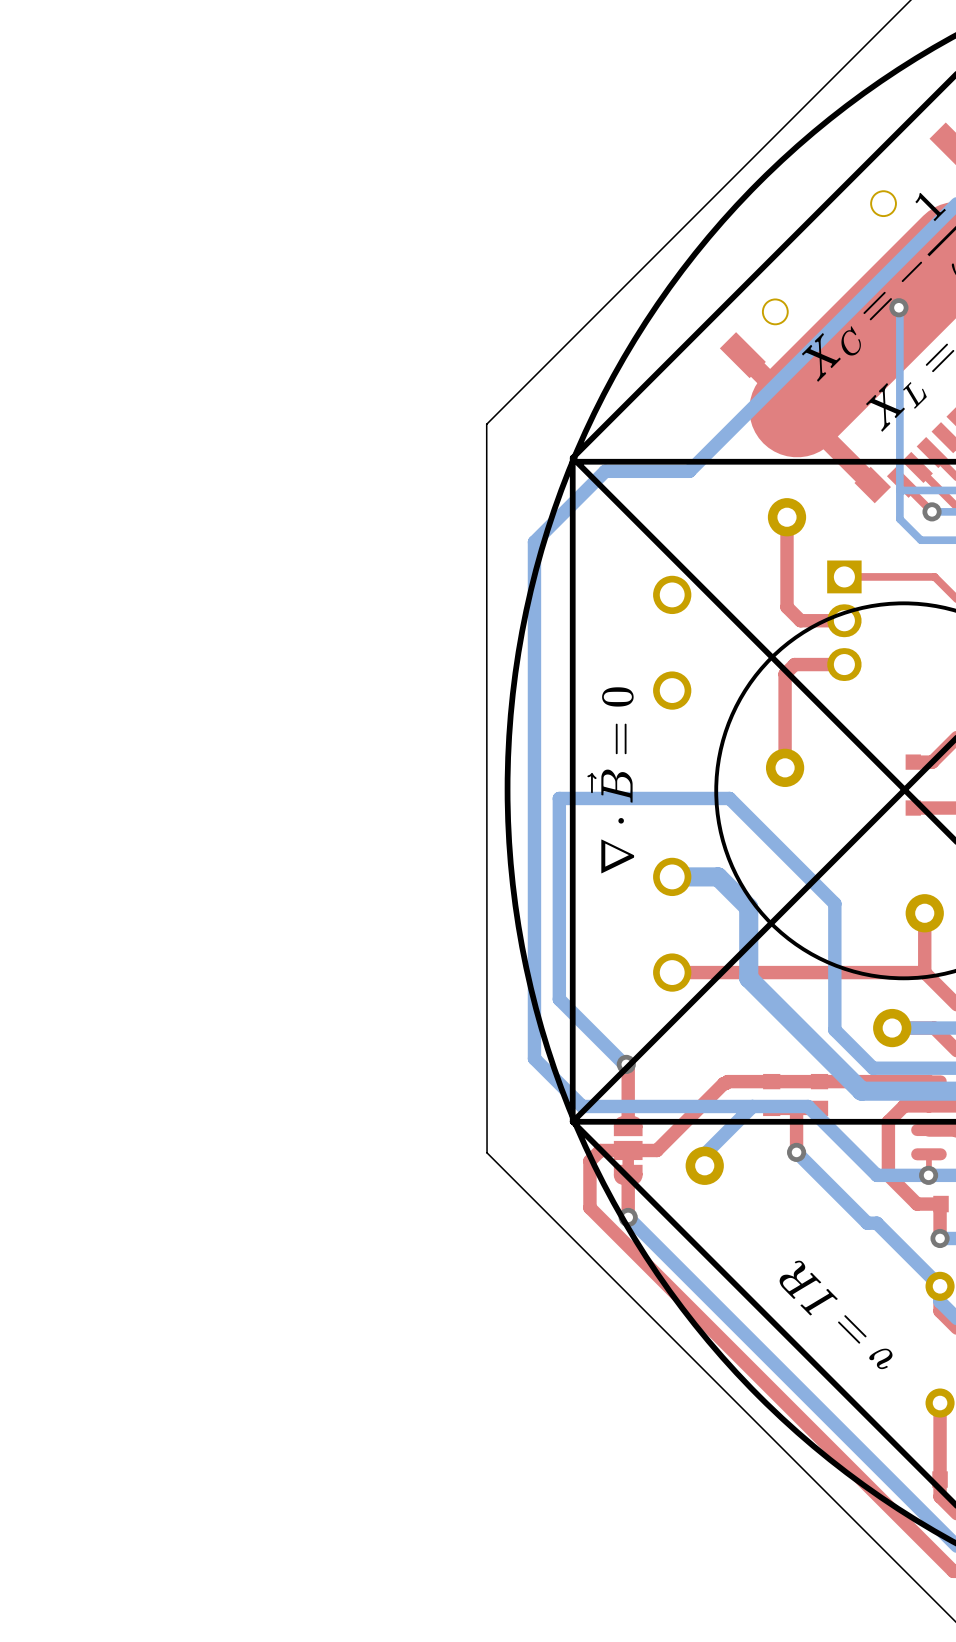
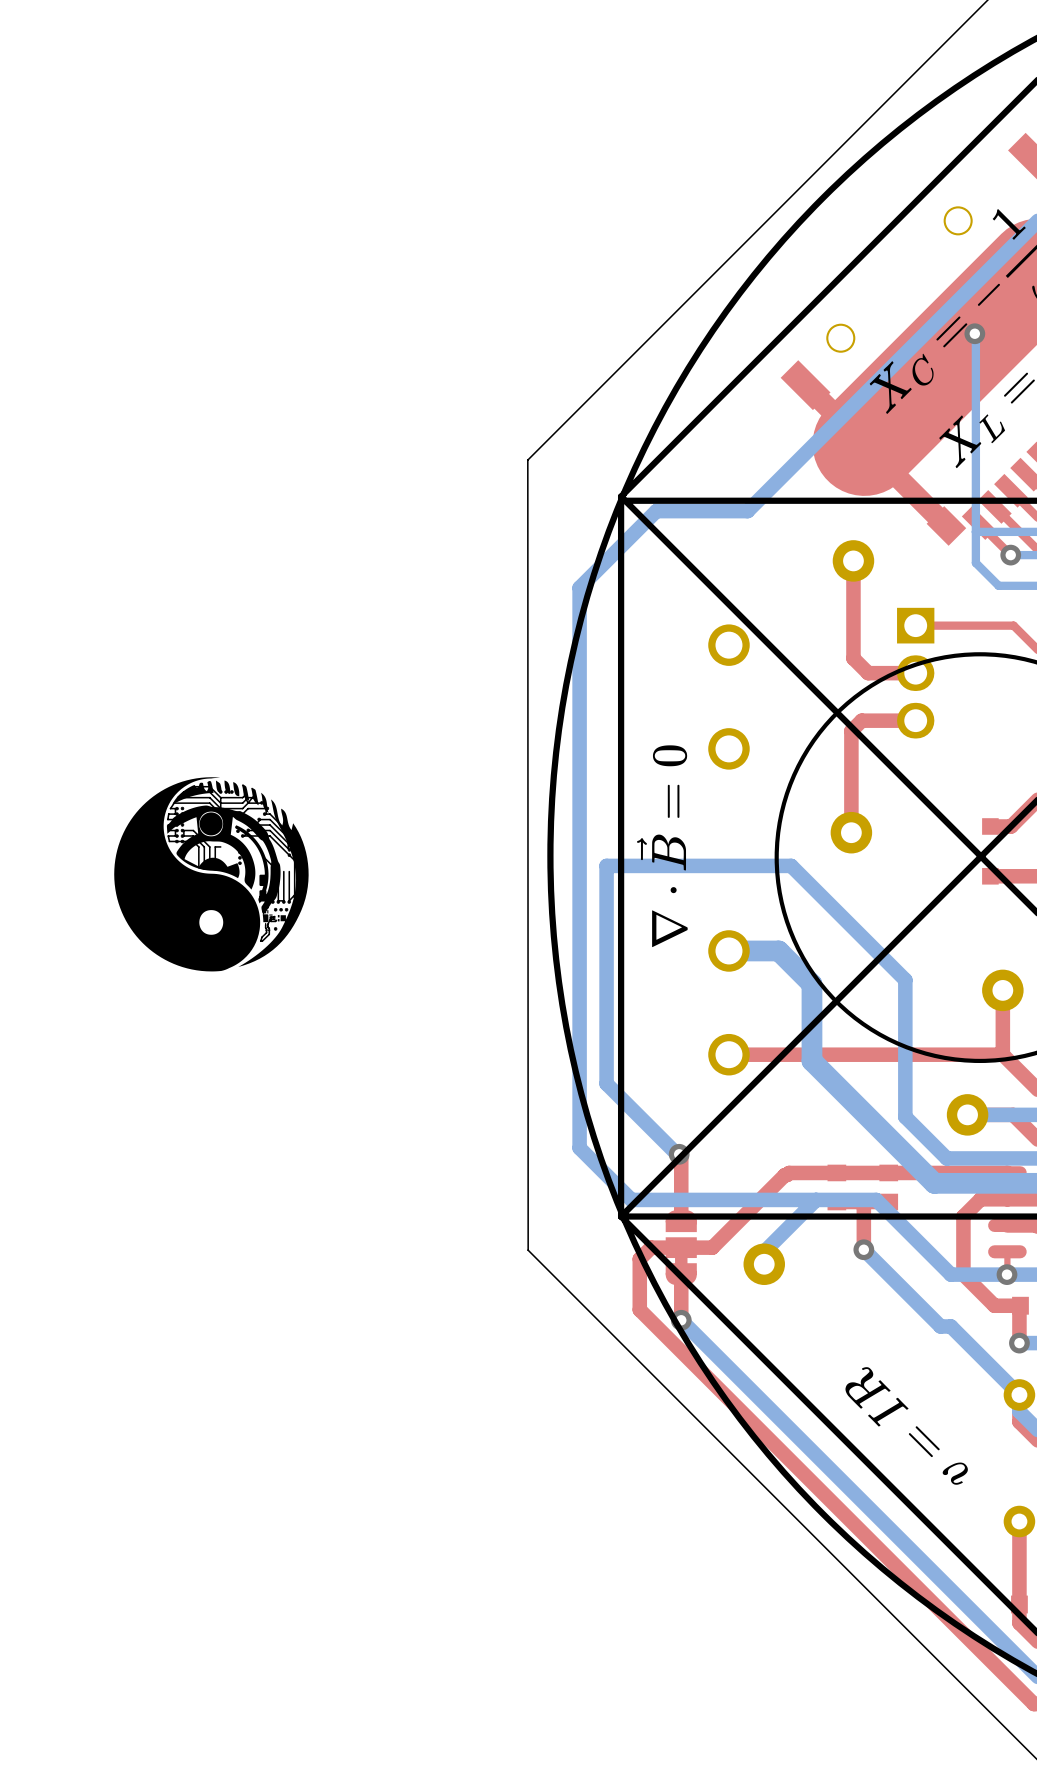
drawing: none -> [114, 777, 309, 972]
line: none -> (192, 786) (209, 786) (220, 797)
line: none -> (220, 797) (242, 797) (244, 795) (248, 803)
line: none -> (220, 797) (220, 808)
line: none -> (248, 803) (252, 797) (248, 797) (242, 803) (220, 803) (209, 792) (183, 792) (177, 797) (209, 797) (220, 808)
line: none -> (248, 803) (242, 808) (220, 808)
line: none -> (260, 803) (248, 803)
line: none -> (220, 846) (215, 846) (215, 869) (209, 868) (209, 846) (193, 830) (183, 830) (183, 835) (193, 835) (204, 846) (204, 868) (198, 867) (198, 846) (193, 841) (169, 841) (168, 835) (175, 835) (175, 830) (168, 830) (168, 825) (175, 825) (175, 819) (167, 819) (168, 814) (175, 814) (175, 808) (170, 808) (174, 803) (209, 803) (220, 814) (242, 814) (248, 808) (266, 808) (266, 814) (270, 814) (288, 832) (288, 837) (270, 819) (260, 819) (255, 825) (270, 825) (288, 843) (288, 848) (270, 830) (249, 830) (244, 835) (270, 835) (294, 860) (294, 894) (289, 900) (289, 871)
line: none -> (264, 857) (278, 871) (278, 900) (283, 900) (283, 871)
line: none -> (270, 917) (273, 917) (273, 919) (270, 919) (270, 921) (276, 920)
line: none -> (270, 917) (267, 924) (269, 934) (260, 941) (266, 932) (265, 924)

